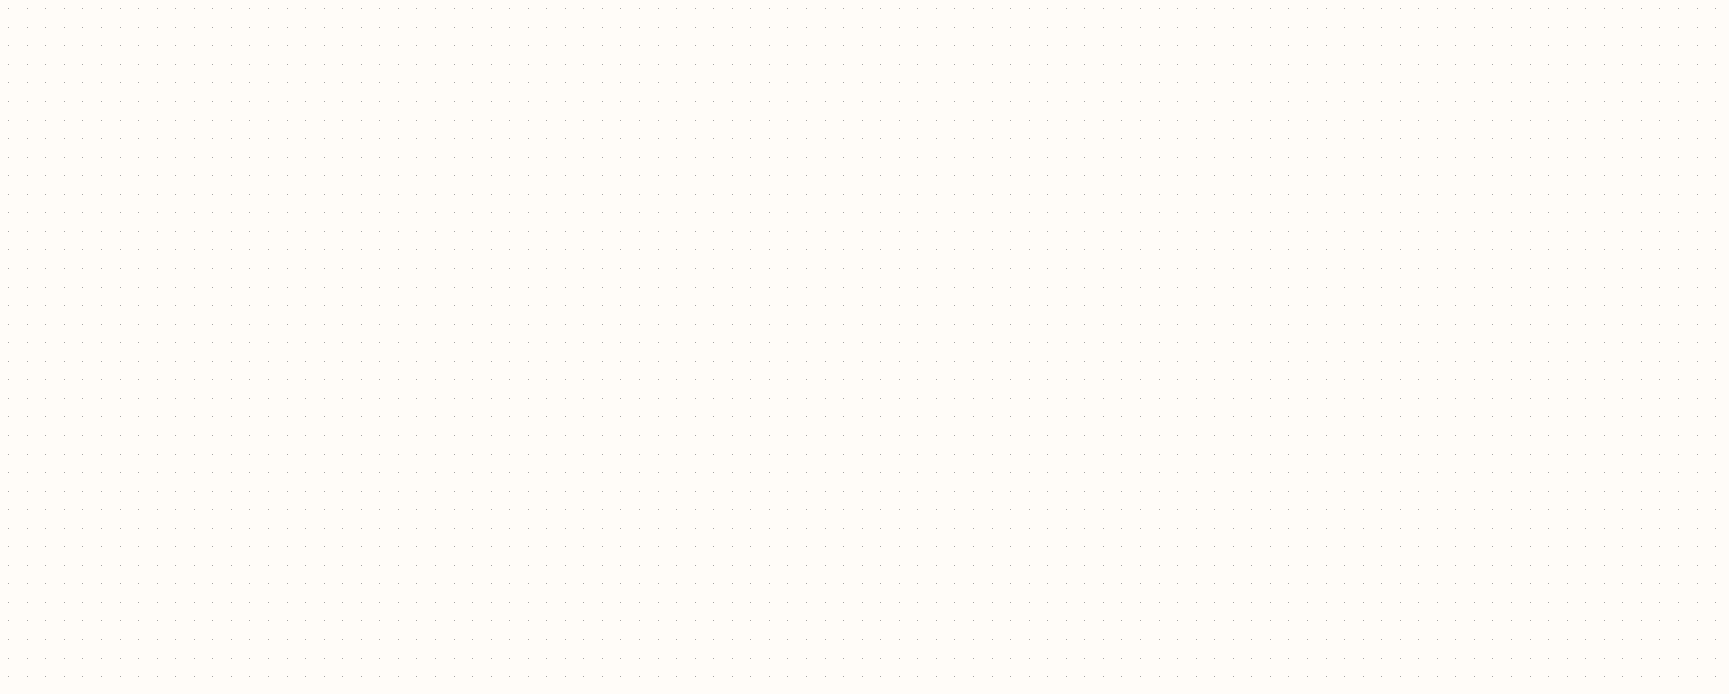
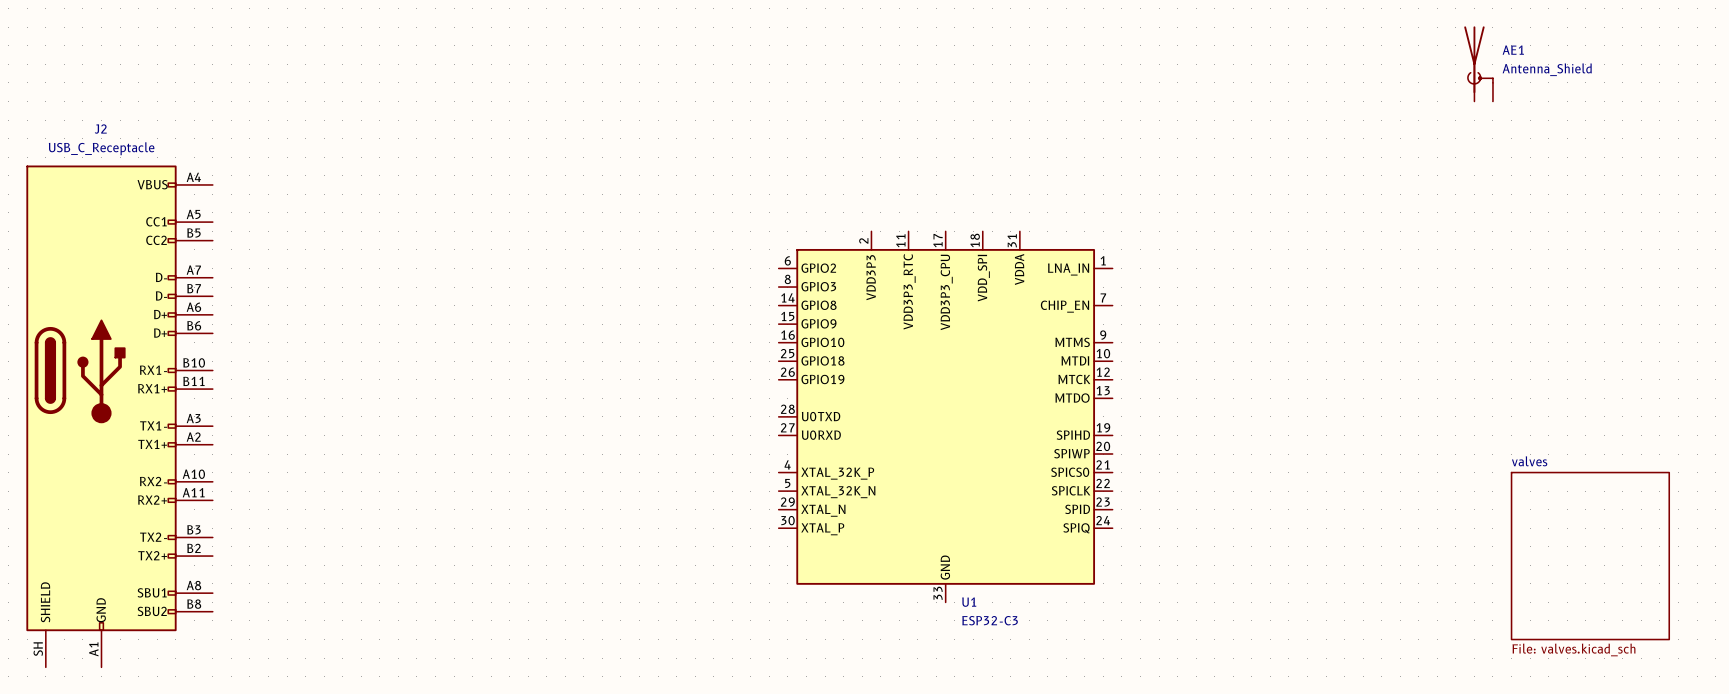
AE1: none -> Antenna_Shield (1478, 63)
J2: none -> USB_C_Receptacle (119, 416)
U1: none -> ESP32-C3 (945, 416)
sheet valves: none -> File: valves.kicad_sch (1590, 556)

